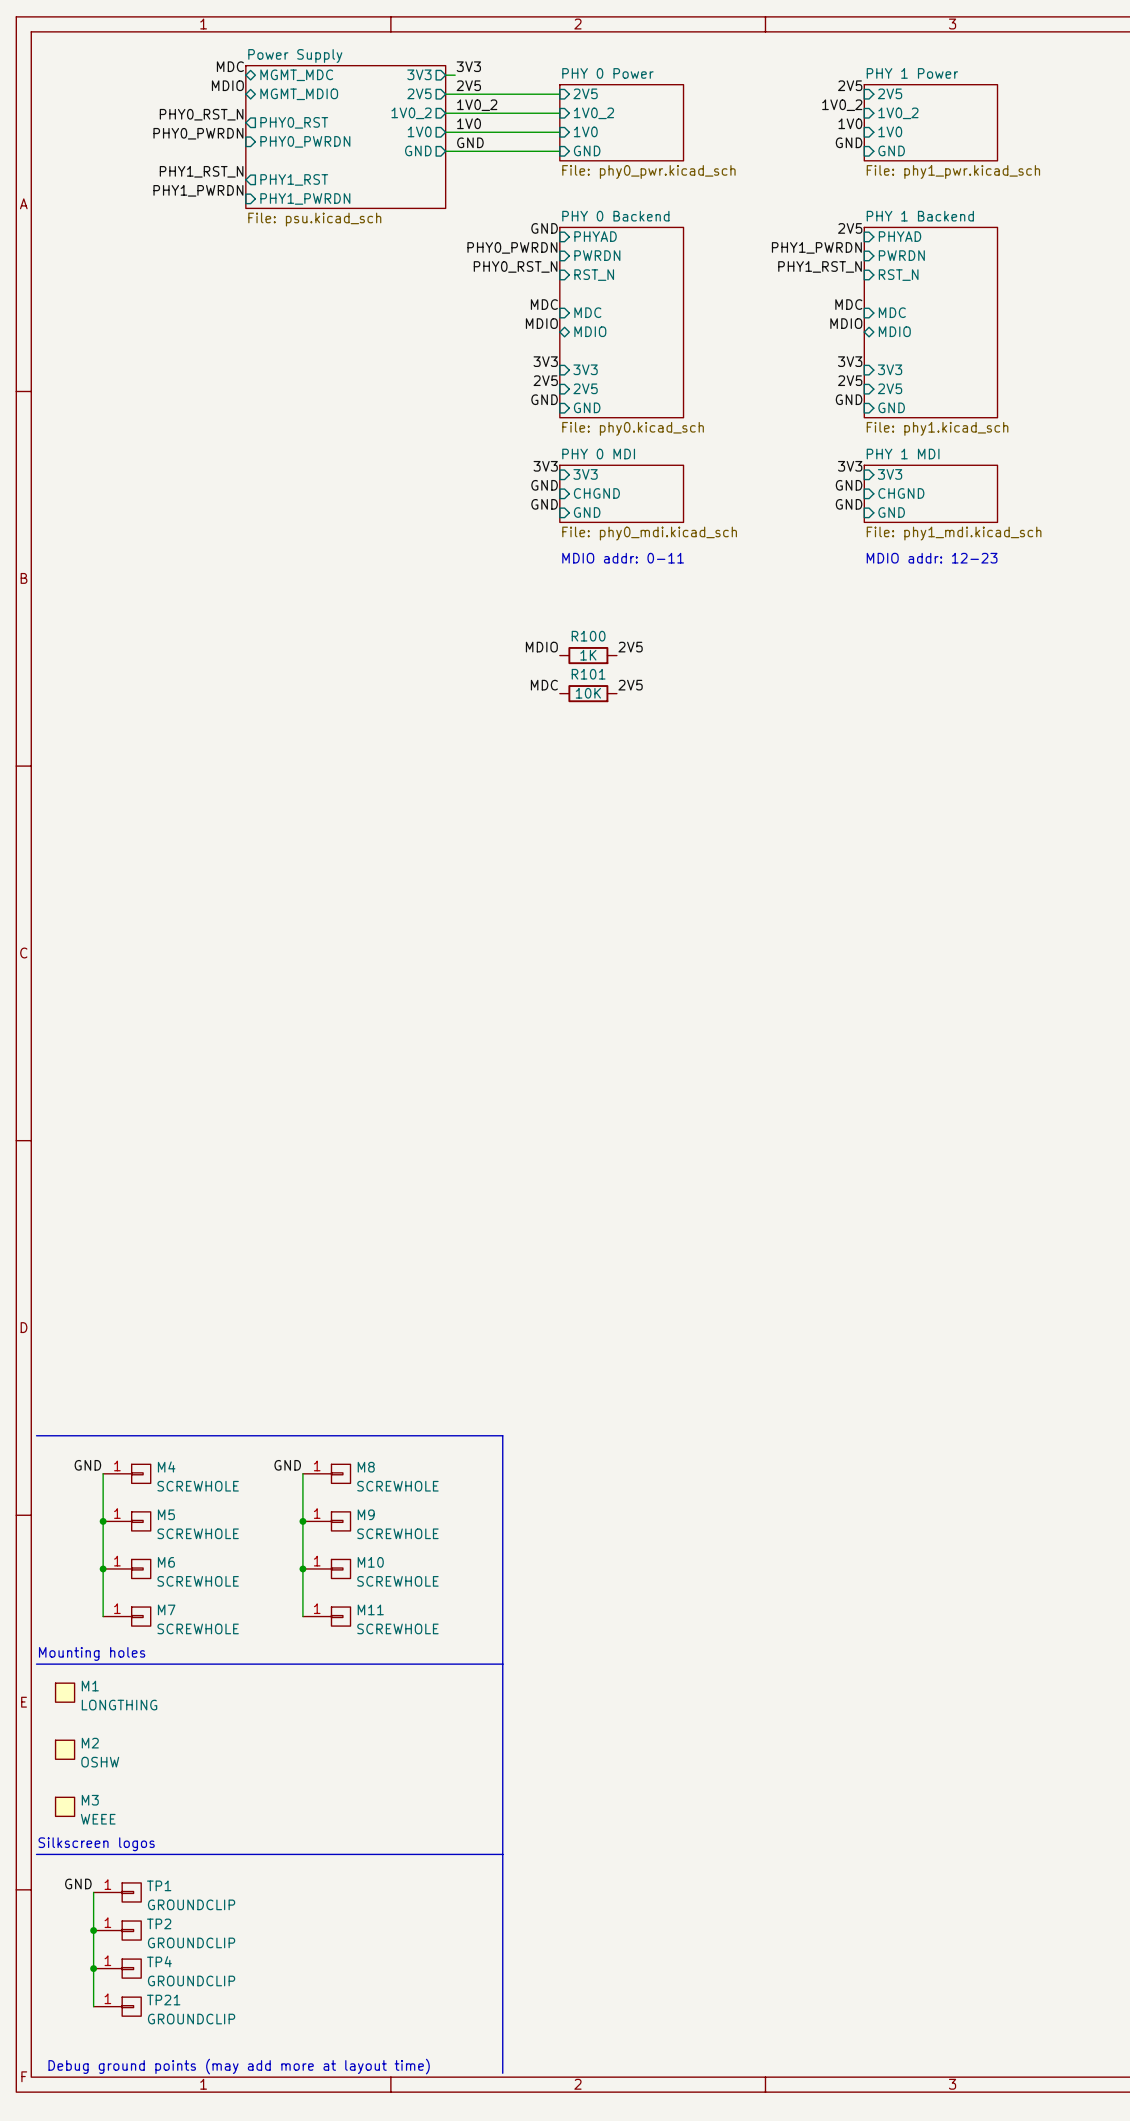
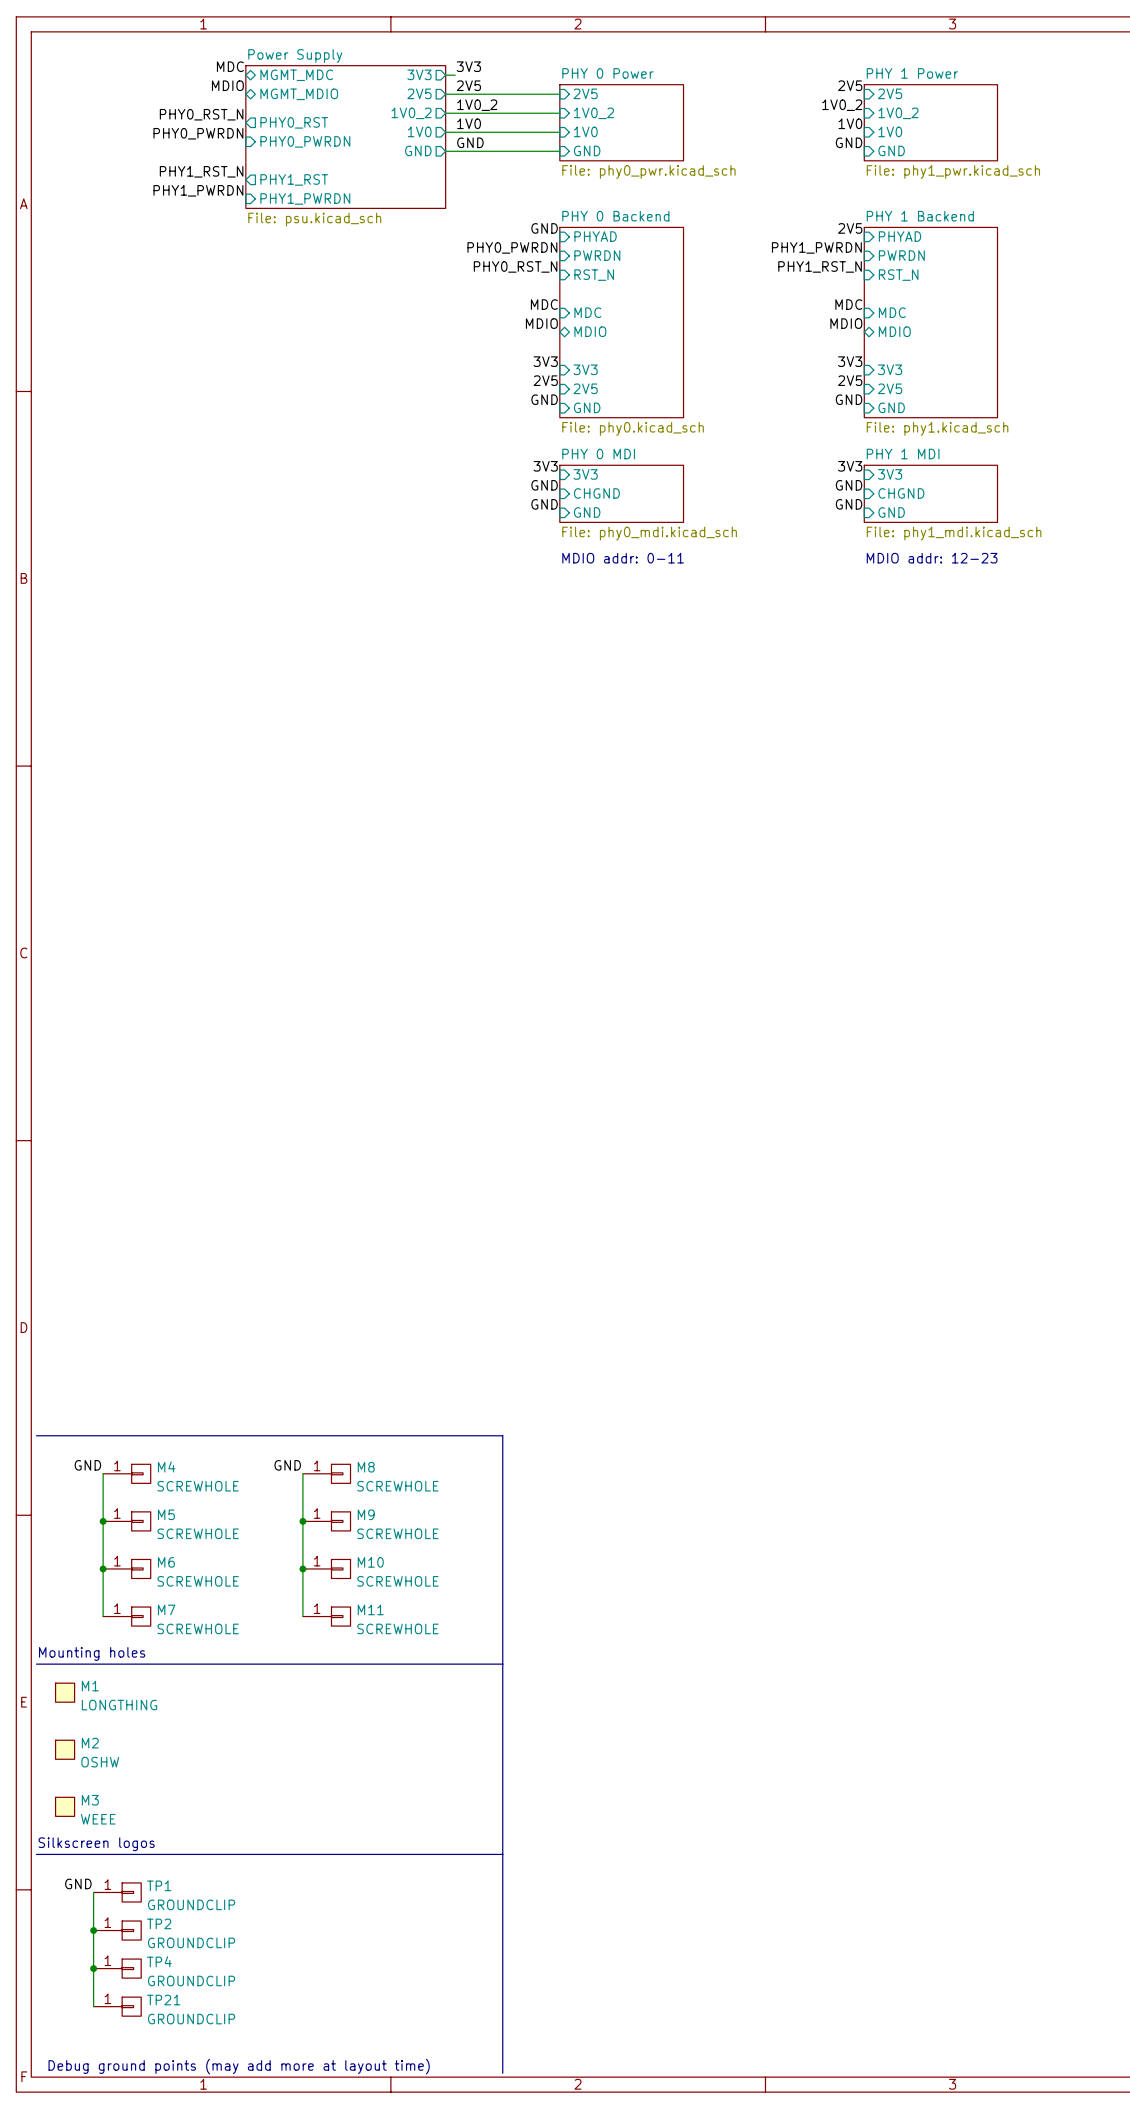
label: MDIO (541, 647) -> none
label: 2V5 (630, 647) -> none
R100: 1K (588, 655) -> none
label: MDC (544, 685) -> none
label: 2V5 (630, 685) -> none
R101: 10K (588, 693) -> none

